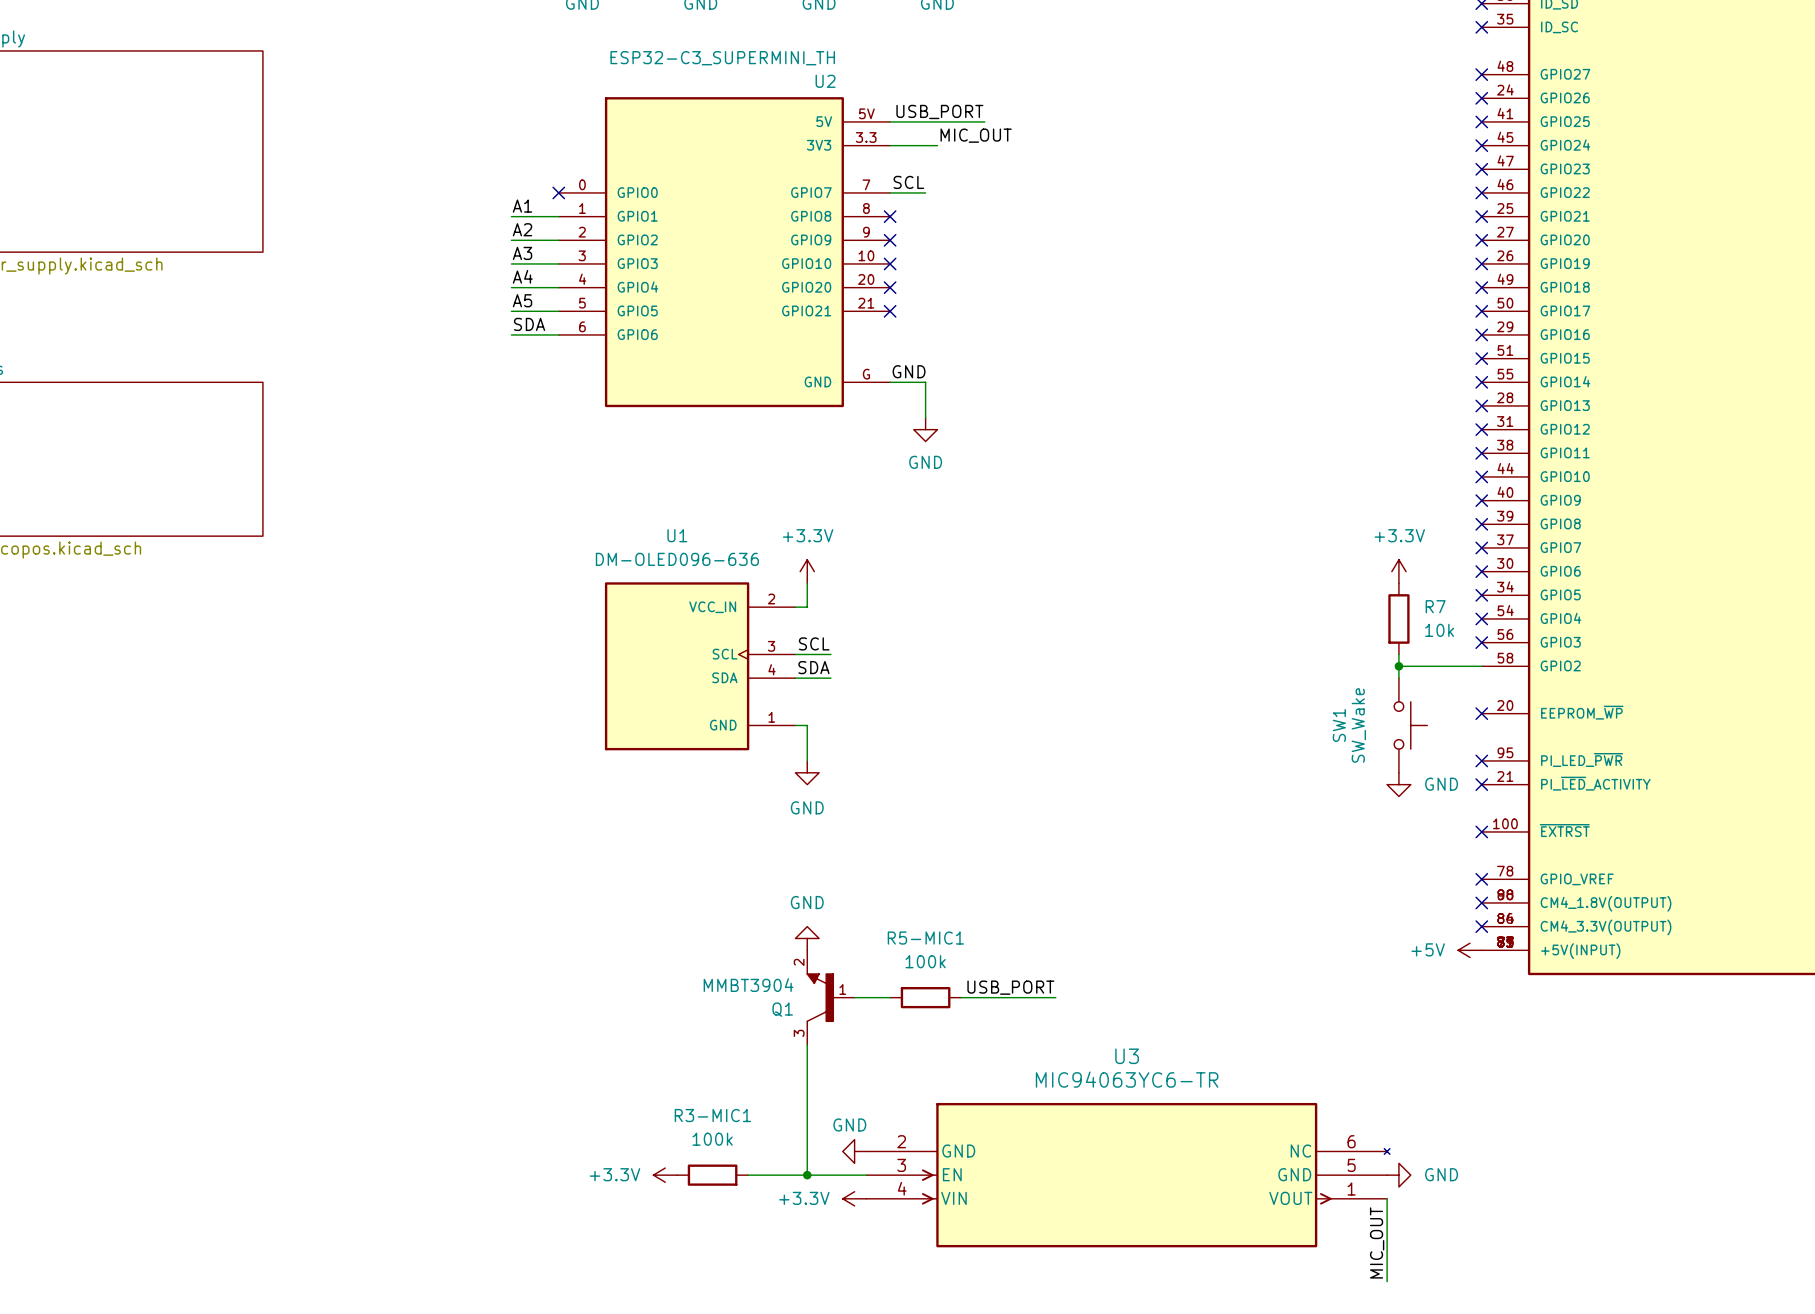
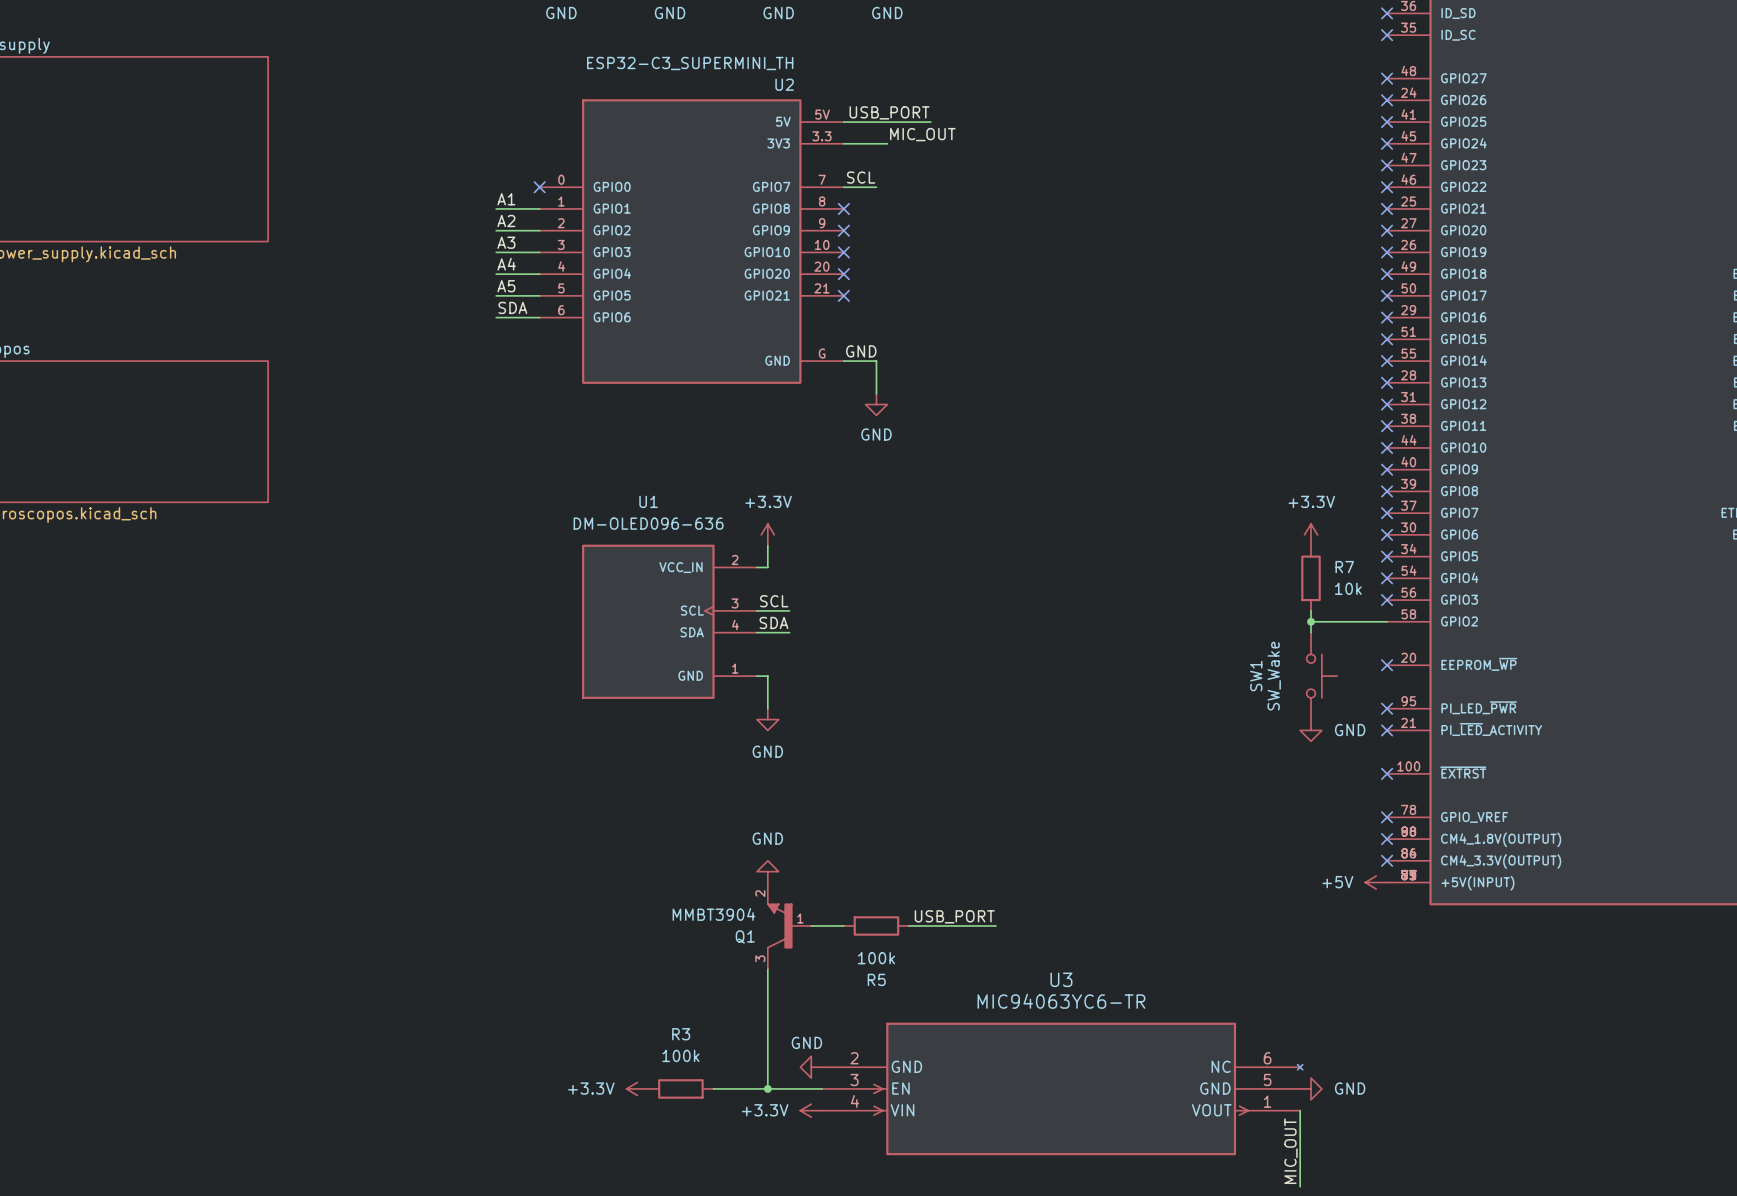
R5-MIC1 name: R5-MIC1 (925, 938) -> R5 (876, 979)
R5-MIC1 value position: 100k (925, 961) -> 100k (876, 958)
R3-MIC1 name: R3-MIC1 (712, 1115) -> R3 (681, 1034)

